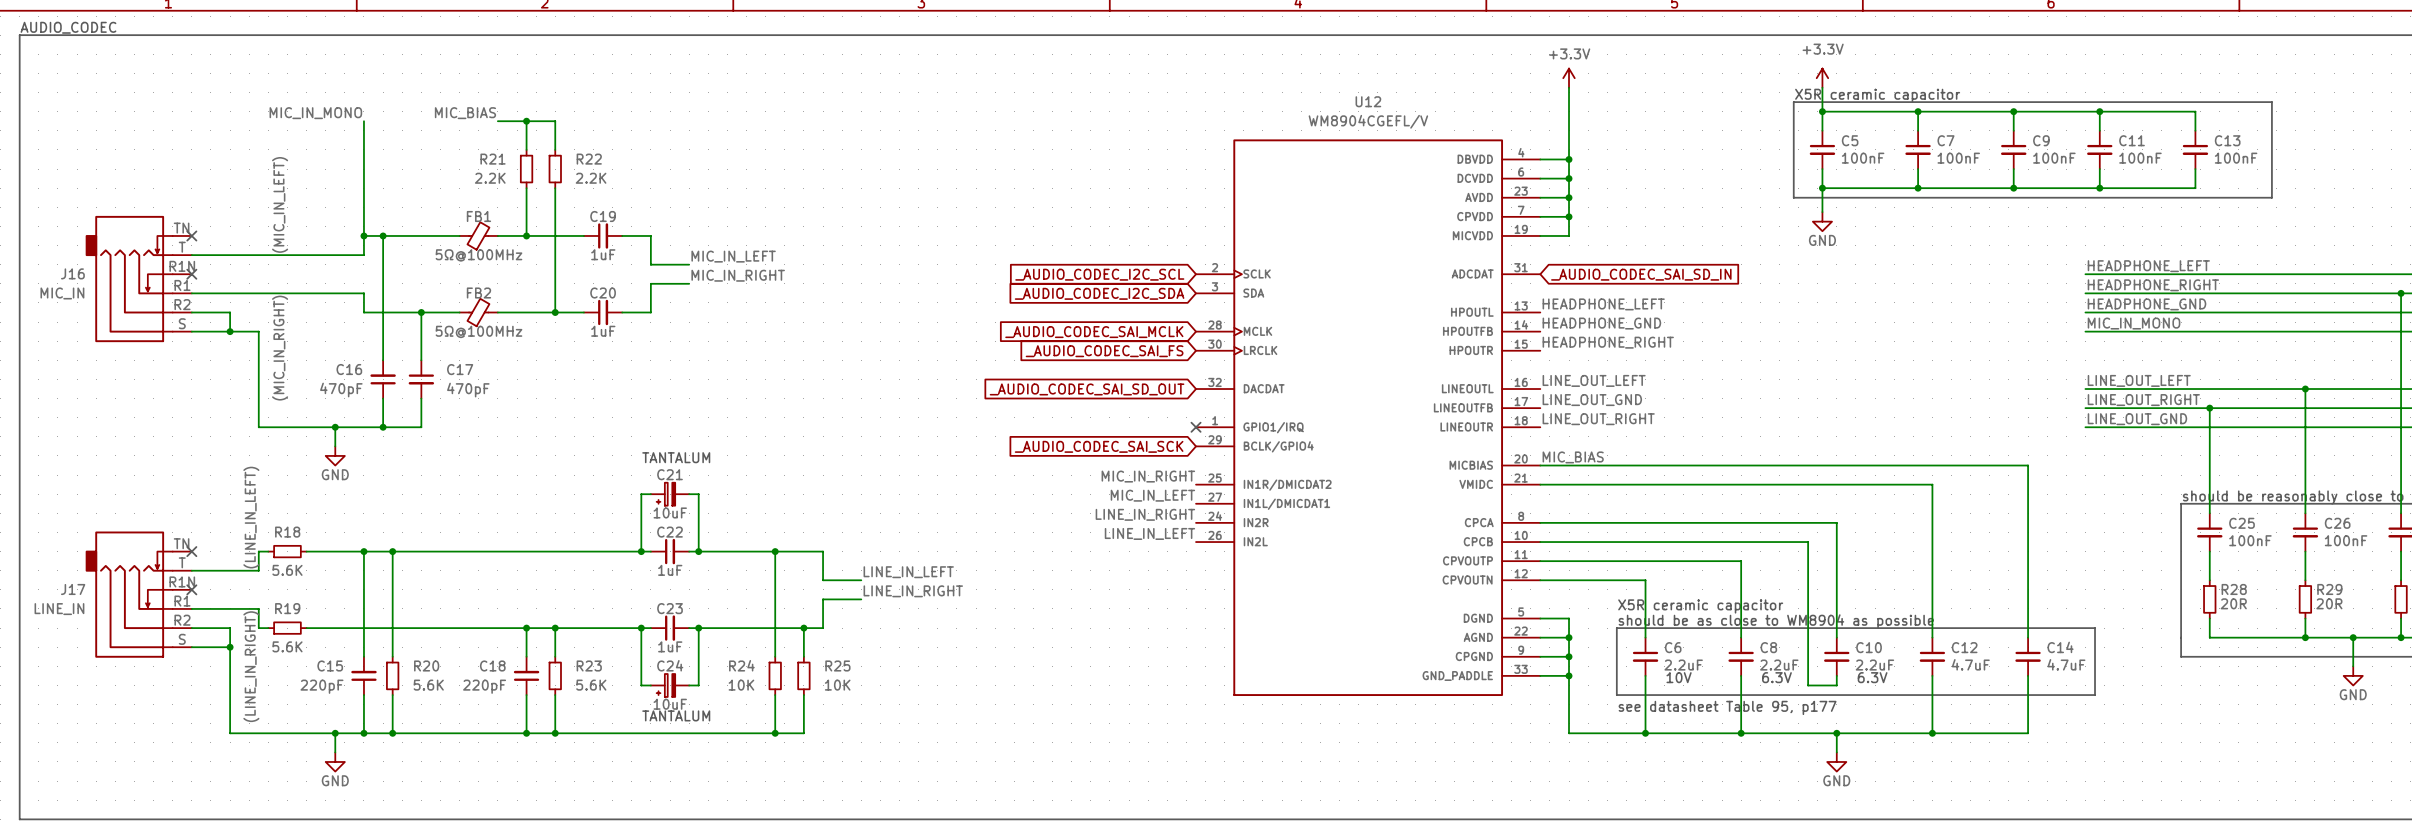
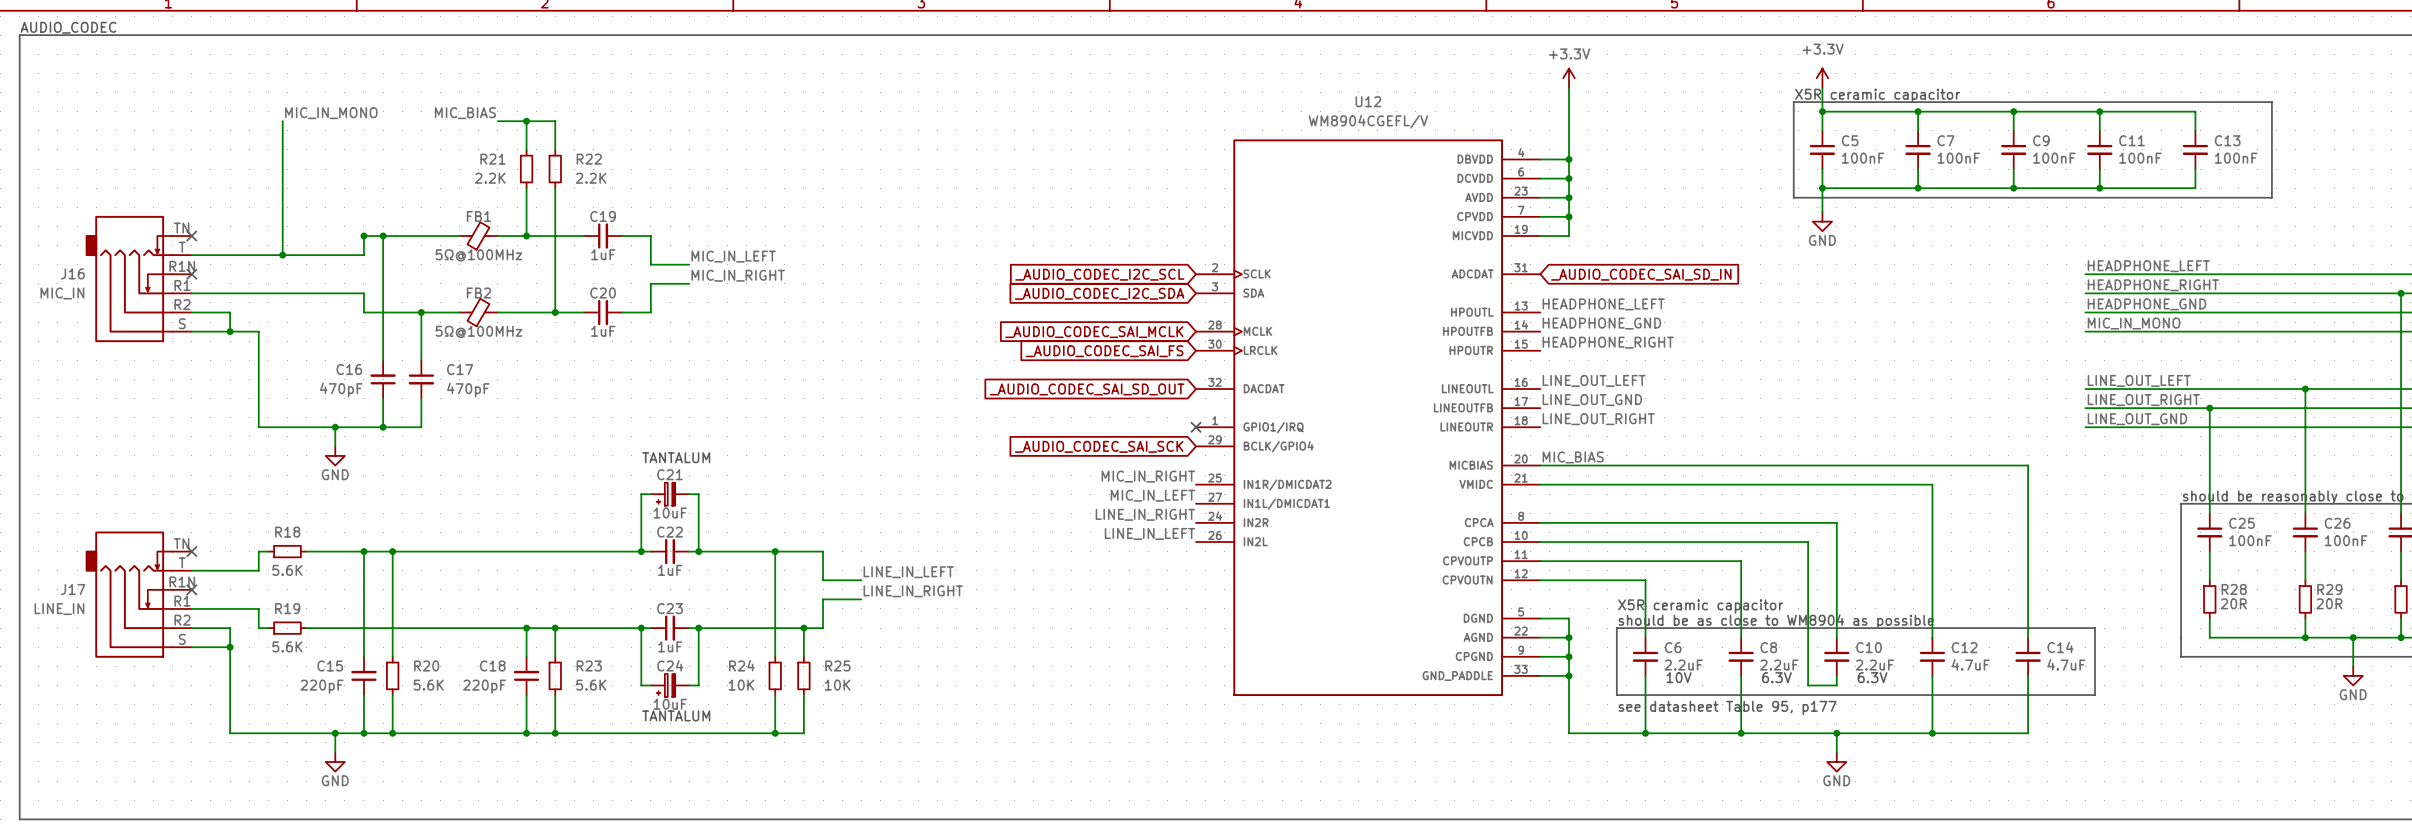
label position: MIC_IN_MONO (315, 113) -> MIC_IN_MONO (331, 113)
wire: none -> (282, 121) (282, 255)
wire: (363, 121) (363, 235) -> none
label: (MIC_IN_LEFT) (280, 204) -> none
junction: none -> (282, 255)
label: (MIC_IN_RIGHT) (280, 348) -> none
label: (LINE_IN_LEFT) (251, 517) -> none
label: (LINE_IN_RIGHT) (251, 666) -> none

